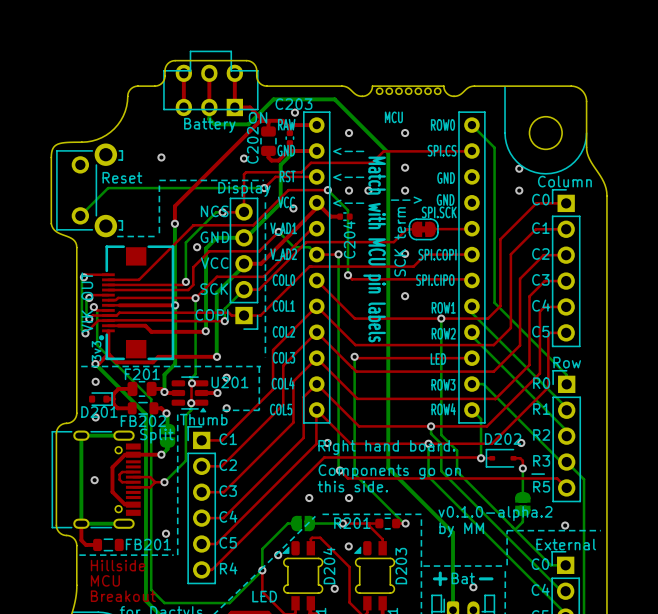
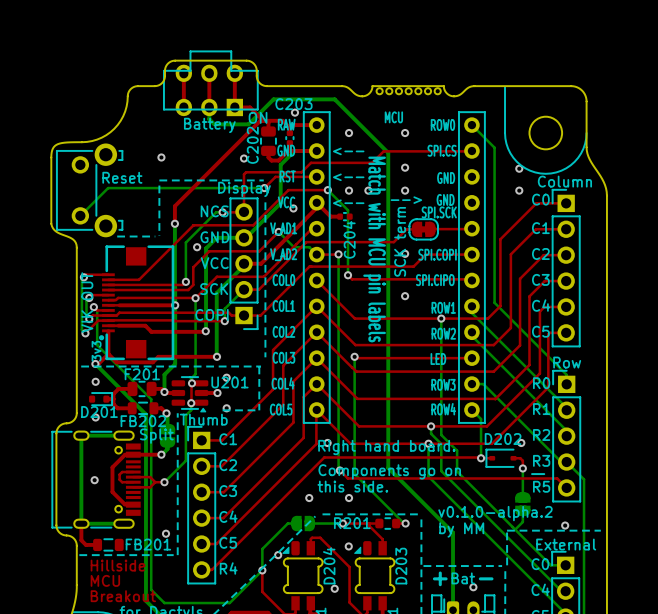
part value: LED (264, 596) -> none

